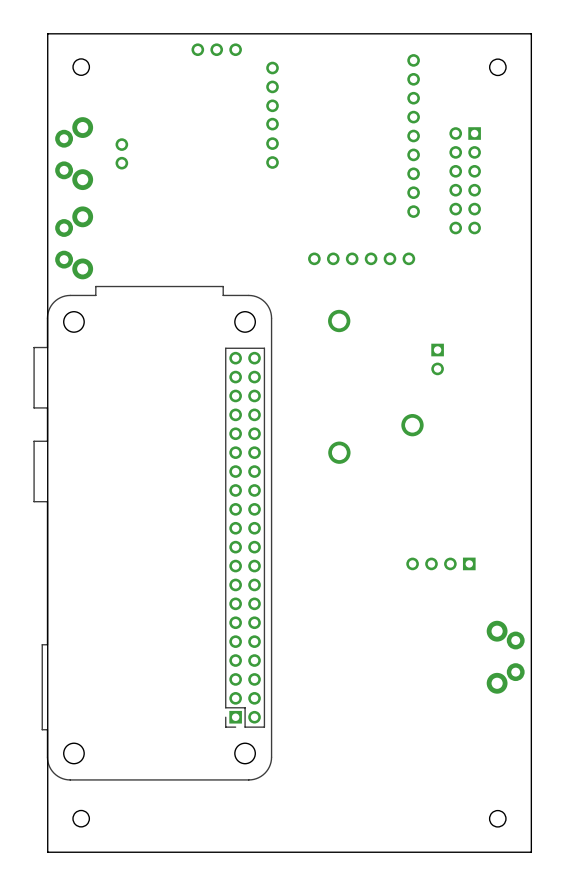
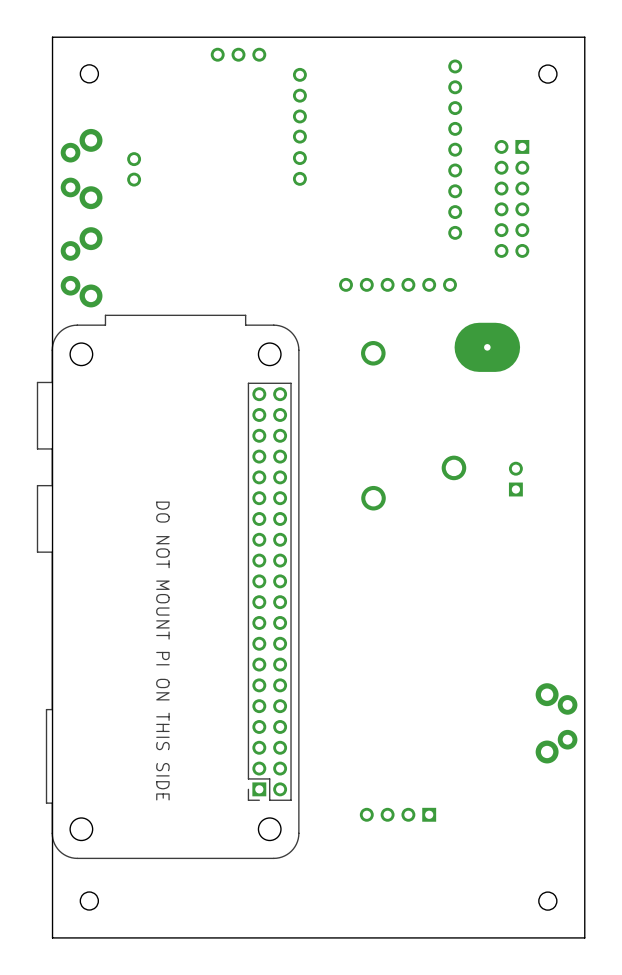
part: none -> (487, 347)
part rotation: 0° (437, 359) -> 180° (515, 479)
part position: (437, 359) -> (515, 479)
part: (440, 563) -> none
text: none -> DO NOT MOUNT PI ON THIS SIDE (162, 651)
part: none -> (397, 814)

